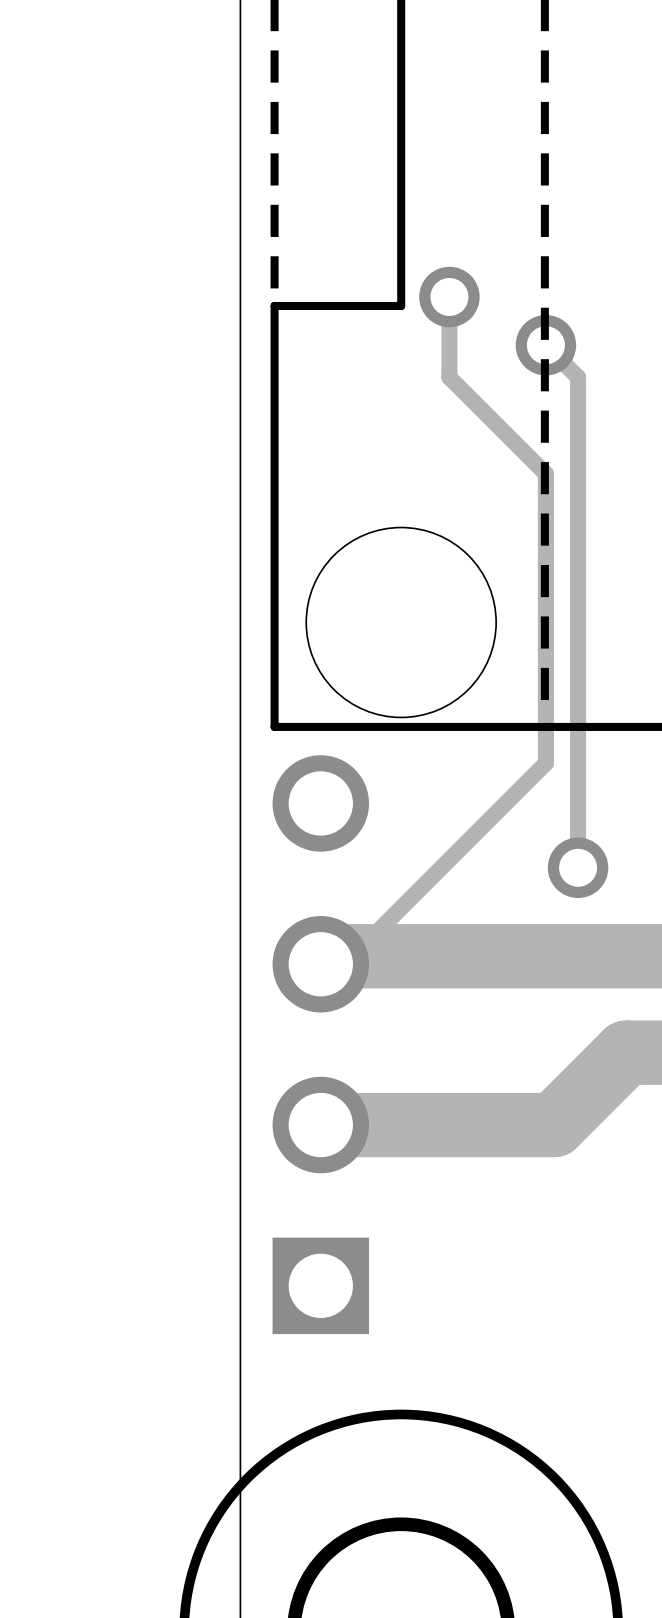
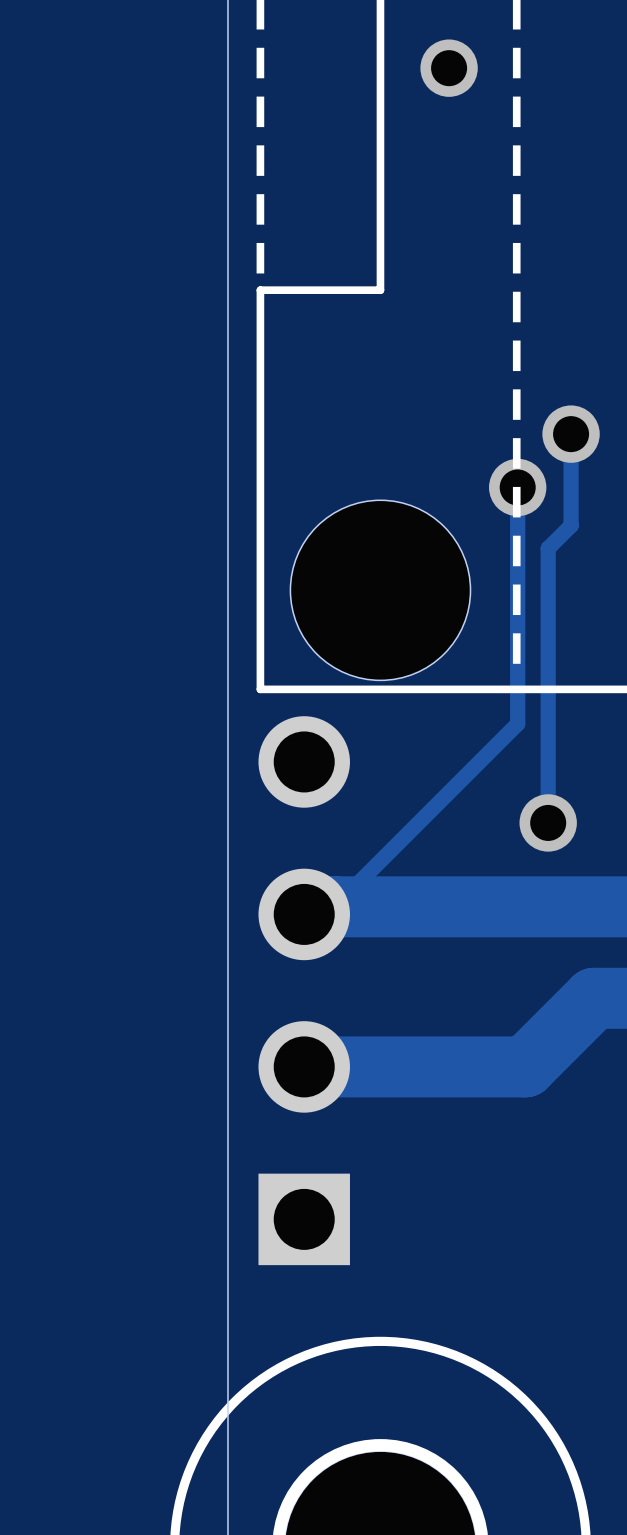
via: none -> (449, 68)
track: (449, 296) (449, 377) (545, 473) (545, 514) -> none
via: (449, 296) -> none
track: (545, 345) (578, 377) (578, 578) -> (571, 434) (571, 525) (548, 548)
via: (545, 345) -> none
via: none -> (571, 434)
via: none -> (517, 487)

